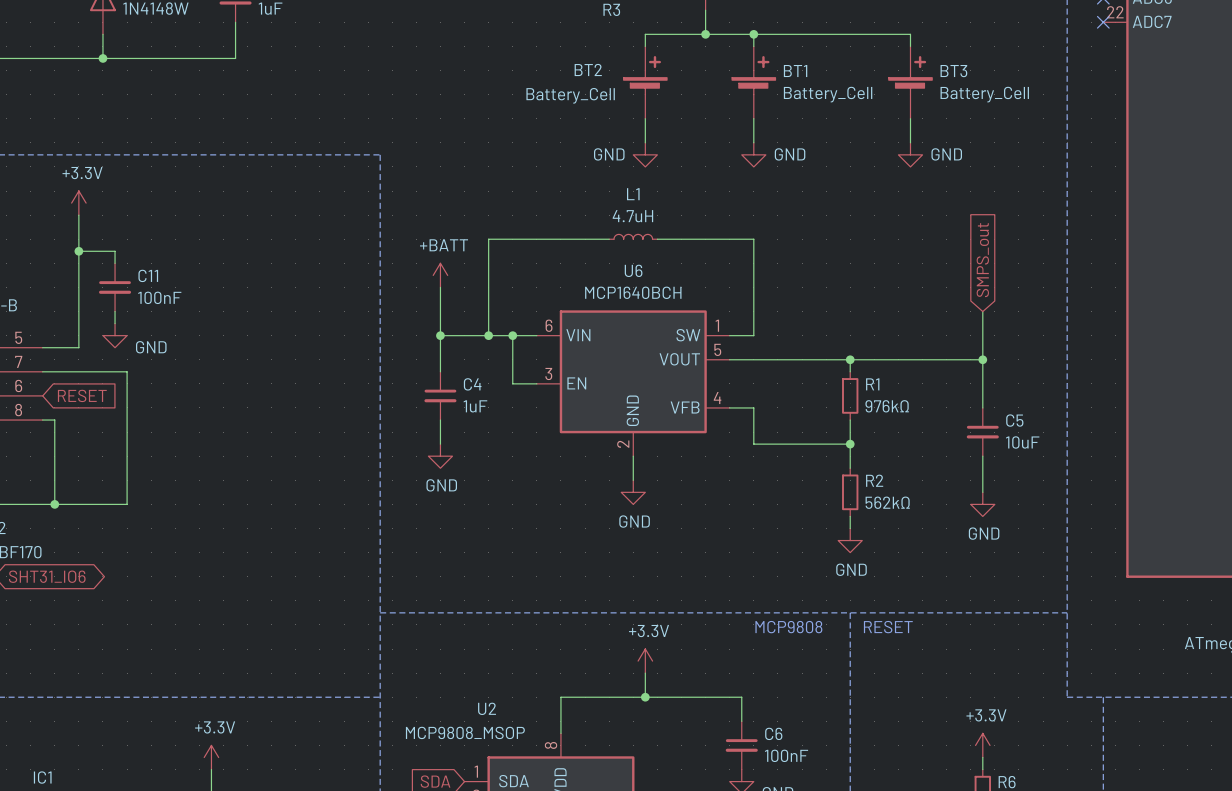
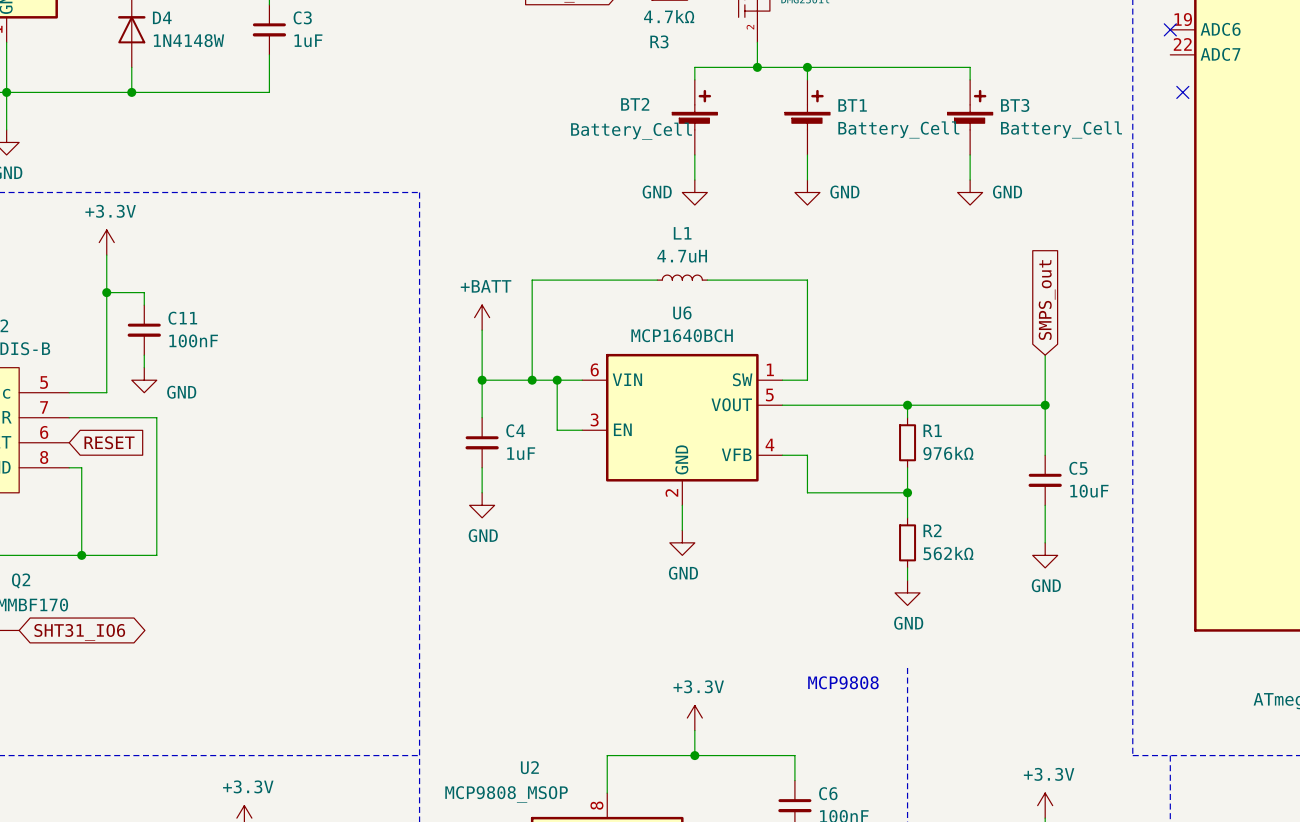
no-connect mark position: (1103, 22) -> (1182, 92)
line: (380, 612) (1067, 612) -> none
text: RESET (888, 627) -> none

